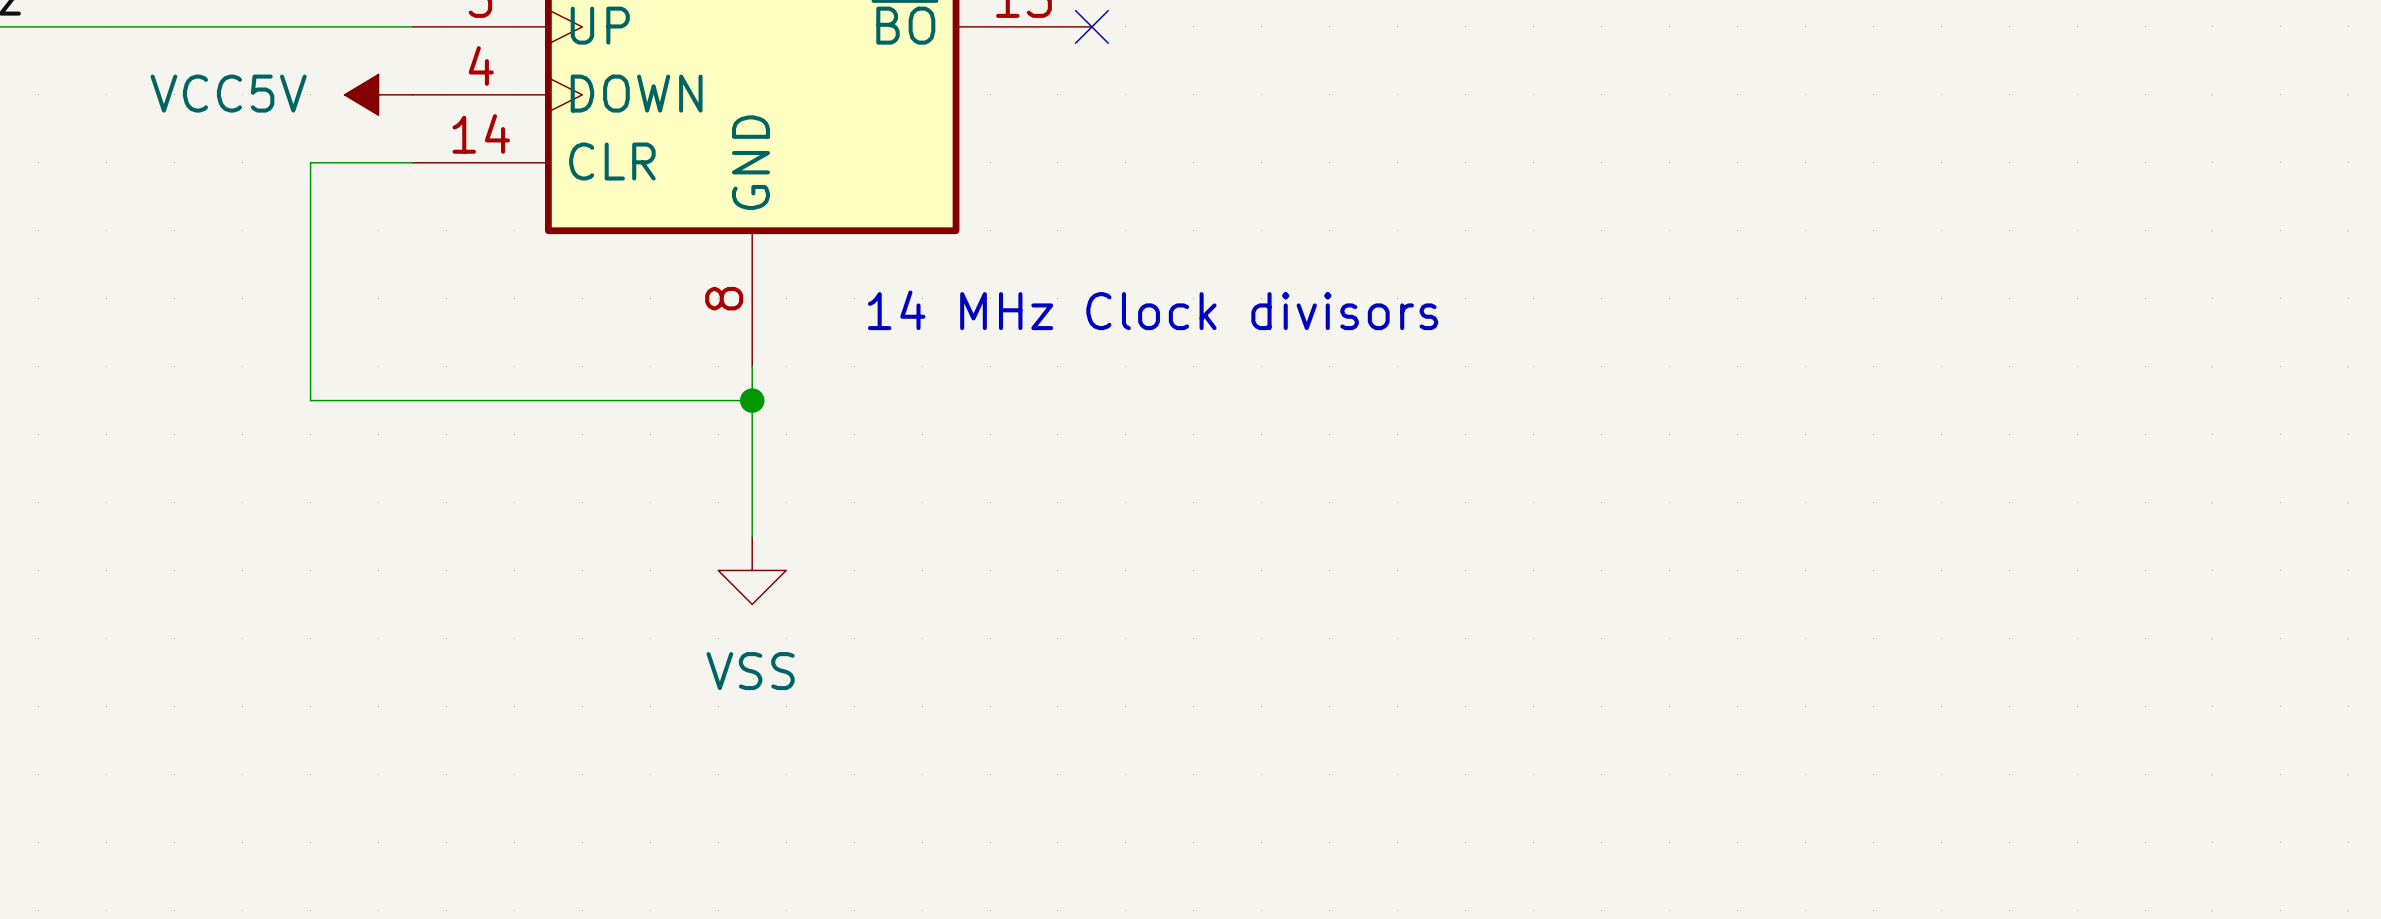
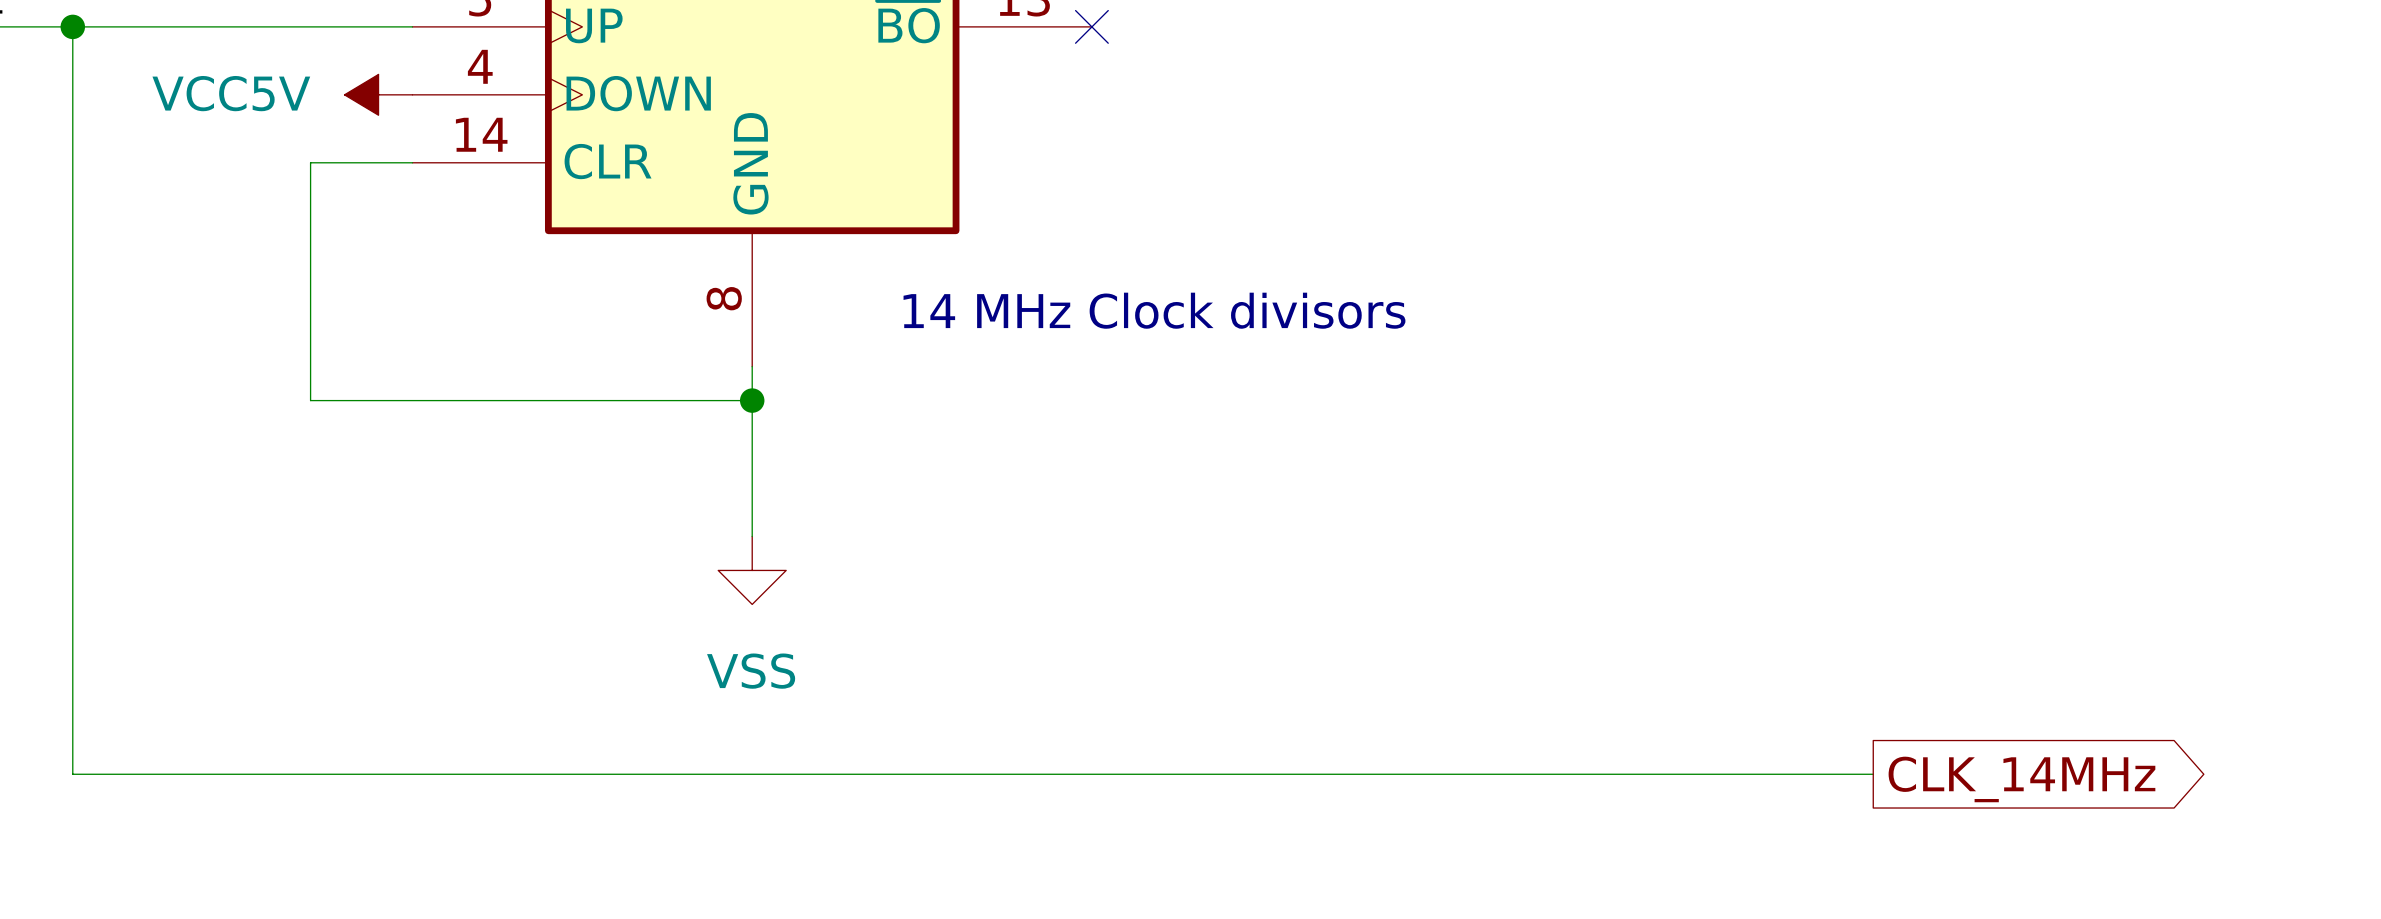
wire: none -> (72, 26) (72, 774) (1873, 774)
junction: none -> (72, 26)
global label: none -> CLK_14MHz (2021, 779)

